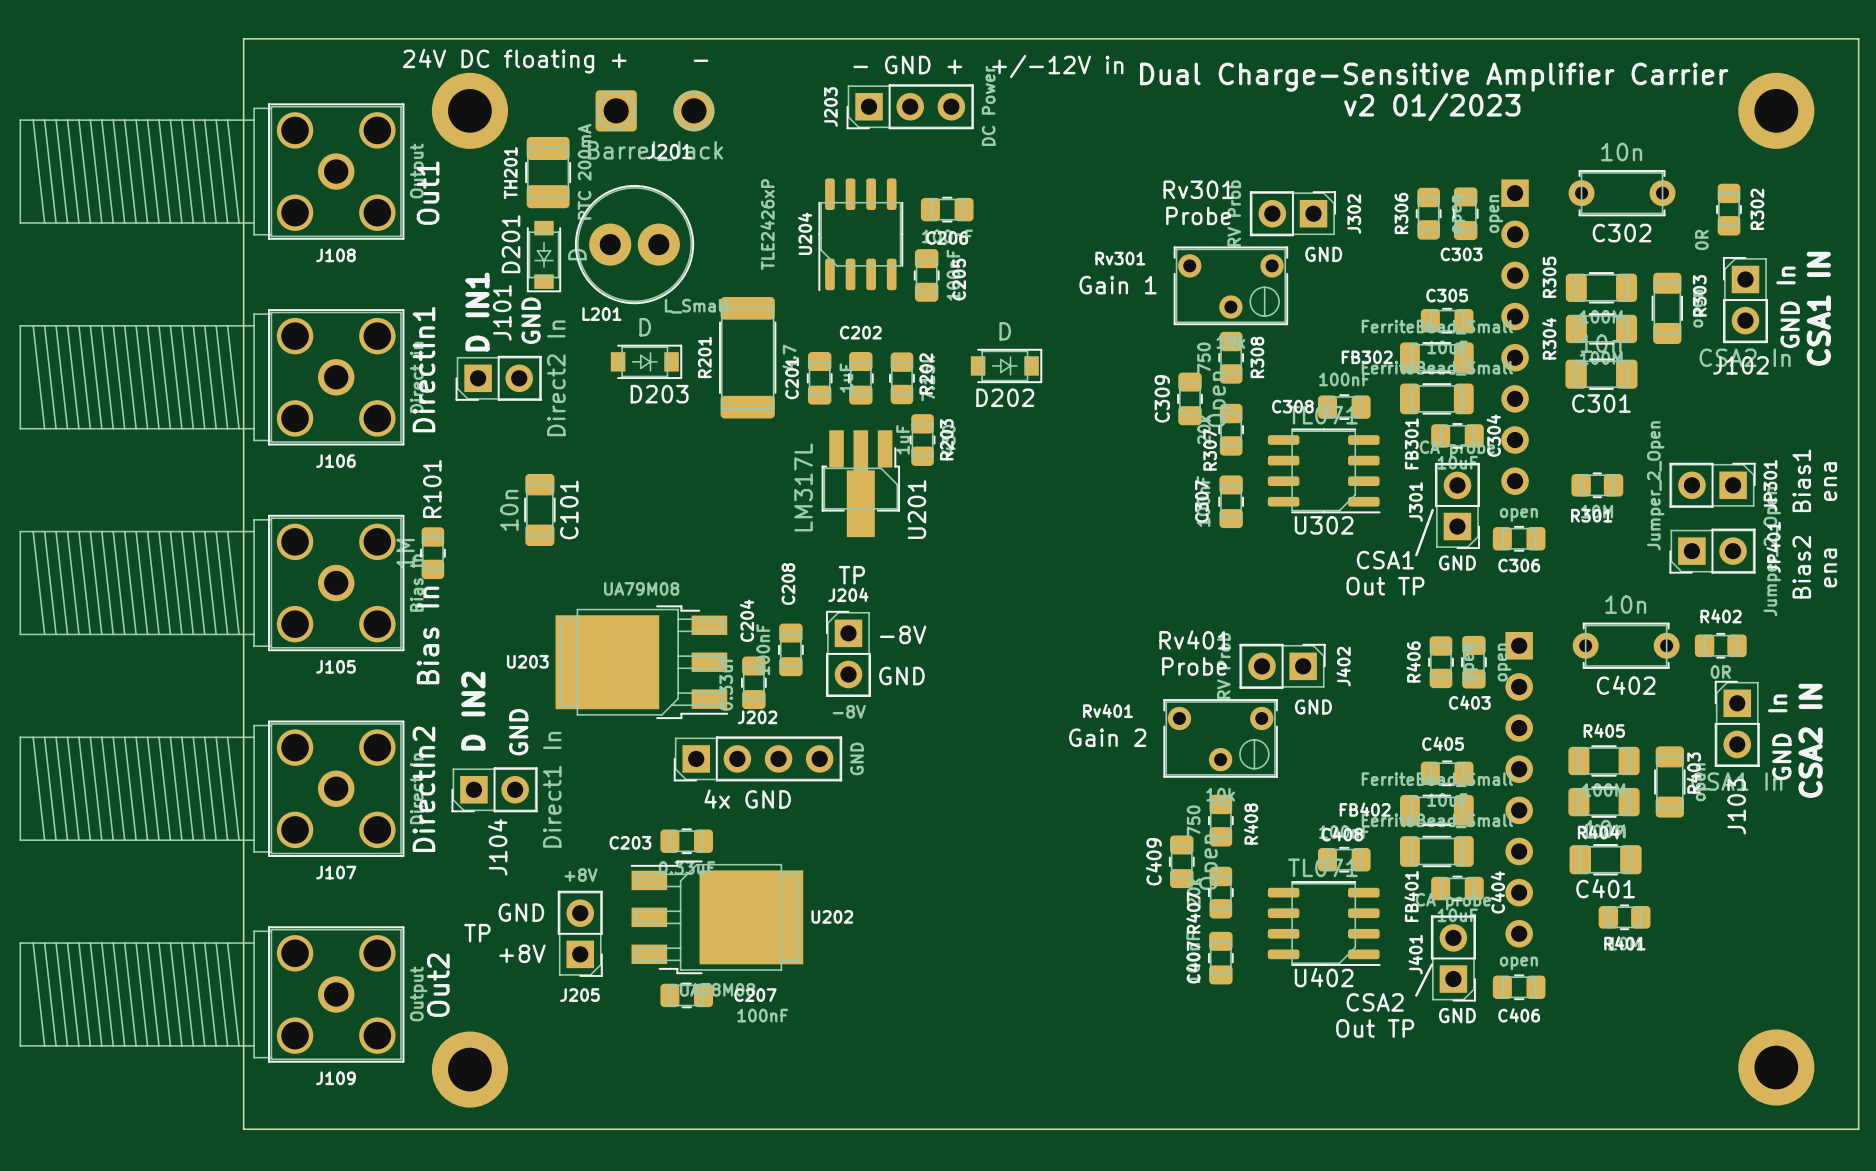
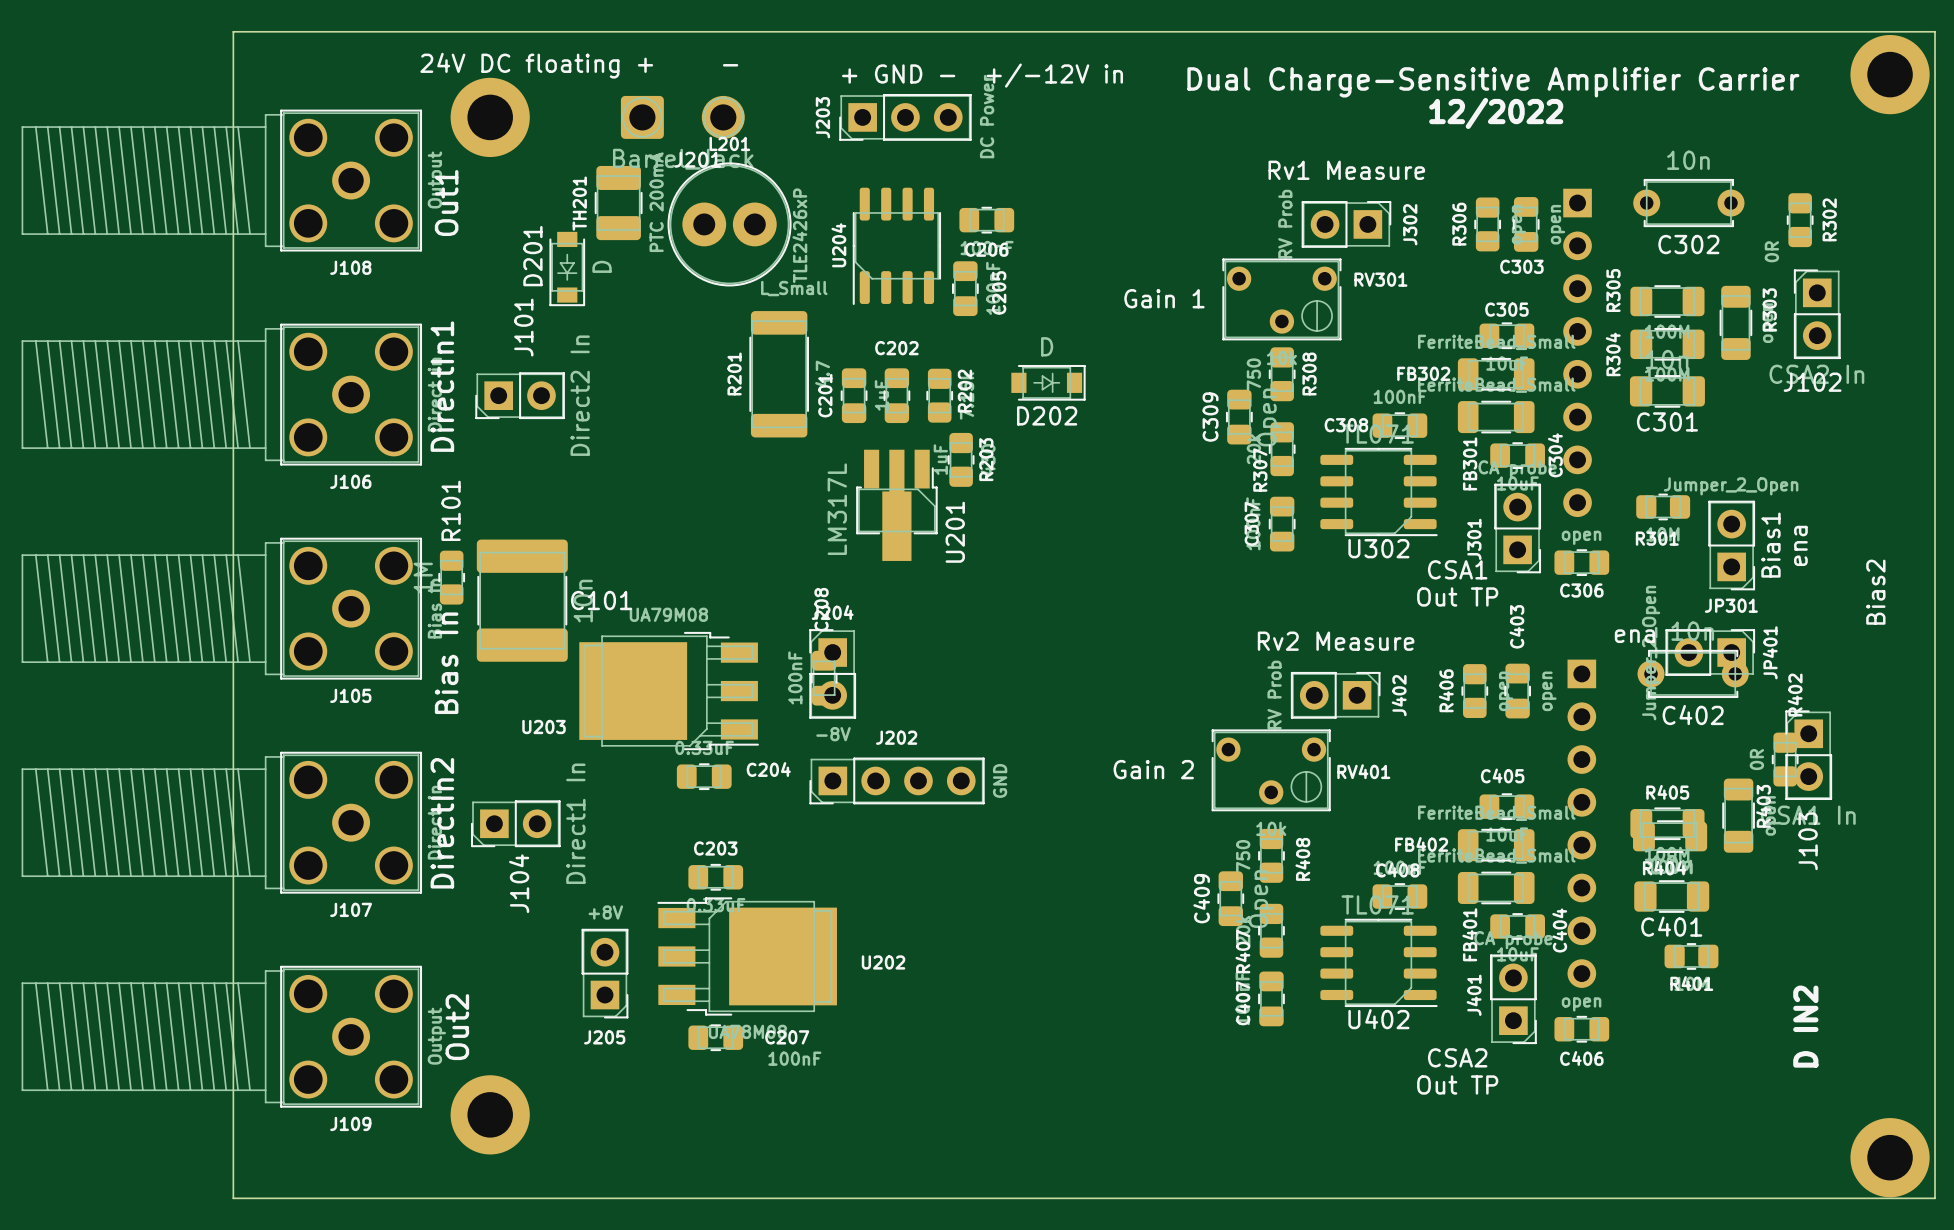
board edge: (1858, 38) (243, 38) (243, 1129) (1858, 1129) -> (1935, 42) (1935, 31) (233, 31) (233, 1198) (1935, 1198) (1935, 1176)
text: - GND + +/-12V in (988, 66) -> + GND - +/-12V in (982, 75)
J203 position: (910, 106) -> (905, 117)
text: v2 01/2023 (1432, 107) -> 12/2022 (1496, 113)
part position: (1776, 110) -> (1890, 74)
text: none -> Rv1 Measure (1346, 170)
TH201 position: (548, 172) -> (618, 203)
text: Rv301 (1198, 189) -> none
text: Probe (1198, 215) -> none
L201 position: (634, 244) -> (729, 224)
text: GND (1323, 254) -> none
Rv301 name: Rv301 (1120, 258) -> RV301 (1380, 279)
text: In (1786, 275) -> none
text: CSA1 IN (1818, 308) -> none
text: D IN1 (477, 312) -> none
L201 name position: L201 (601, 314) -> L201 (729, 143)
text: GND (531, 320) -> none
text: GND (1790, 324) -> none
D203: D (646, 361) -> none
C101 footprint: [524, 473, 556, 547] -> [476, 539, 568, 662]
text position: Bias1 (1801, 480) -> Bias1 (1770, 545)
text: ena (1830, 481) -> none
JP301 rotation: 0° (1712, 485) -> 90° clockwise (1731, 545)
JP301 position: (1712, 485) -> (1731, 545)
J301 name position: J301 (1415, 502) -> J301 (1474, 539)
C101 name position: C101 (569, 509) -> C101 (601, 600)
line: (1432, 509) (1416, 555) -> none
C101 value position: 10n (509, 510) -> 10n (583, 601)
text: none -> ena (1800, 545)
JP401 rotation: 0° (1712, 551) -> 180° (1710, 652)
JP401 position: (1712, 551) -> (1710, 652)
text position: CSA1 (1385, 560) -> CSA1 (1457, 569)
text: GND (1457, 562) -> none
text: ena (1830, 567) -> none
text: TP (851, 575) -> none
text position: Out TP (1385, 586) -> Out TP (1457, 596)
text: none -> ena (1634, 636)
text: none -> Rv2 Measure (1336, 641)
R402 name position: R402 (1721, 616) -> R402 (1795, 695)
text: -8V (903, 634) -> none
text: Rv401 (1194, 639) -> none
R402 rotation: 0° (1720, 645) -> 90° clockwise (1785, 759)
R402 position: (1720, 645) -> (1785, 759)
J204 position: (848, 653) -> (832, 673)
U203 name position: U203 (527, 661) -> U203 (544, 727)
R406 position: (1440, 662) -> (1474, 691)
C403 position: (1473, 662) -> (1517, 691)
text: Probe (1194, 666) -> none
text: GND (901, 676) -> none
C204 rotation: 0° (753, 682) -> 90° clockwise (704, 776)
C204 position: (753, 682) -> (704, 776)
C403 name rotation: 0° (1469, 702) -> 90° counterclockwise (1516, 626)
C403 name position: C403 (1469, 702) -> C403 (1516, 626)
text: In (1777, 703) -> none
text: GND (1313, 707) -> none
Rv401 name: Rv401 (1107, 710) -> RV401 (1363, 771)
text: D IN2 (473, 711) -> none
text: GND (518, 732) -> none
text: CSA2 IN (1810, 740) -> none
text: GND (1781, 756) -> none
J202 position: (757, 758) -> (897, 780)
R405 position: (1603, 760) -> (1667, 823)
text: 4x GND (747, 799) -> none
C203 name position: C203 (630, 842) -> C203 (715, 848)
text: GND (521, 912) -> none
U202 name position: U202 (832, 916) -> U202 (883, 962)
text: TP (477, 933) -> none
text: +8V (522, 953) -> none
line: (1431, 964) (1416, 995) -> none
text: none -> D IN2 (1805, 1026)
text position: CSA2 (1375, 1002) -> CSA2 (1457, 1057)
text: GND (1457, 1015) -> none
text position: Out TP (1375, 1028) -> Out TP (1457, 1084)
part position: (1776, 1067) -> (1890, 1157)

